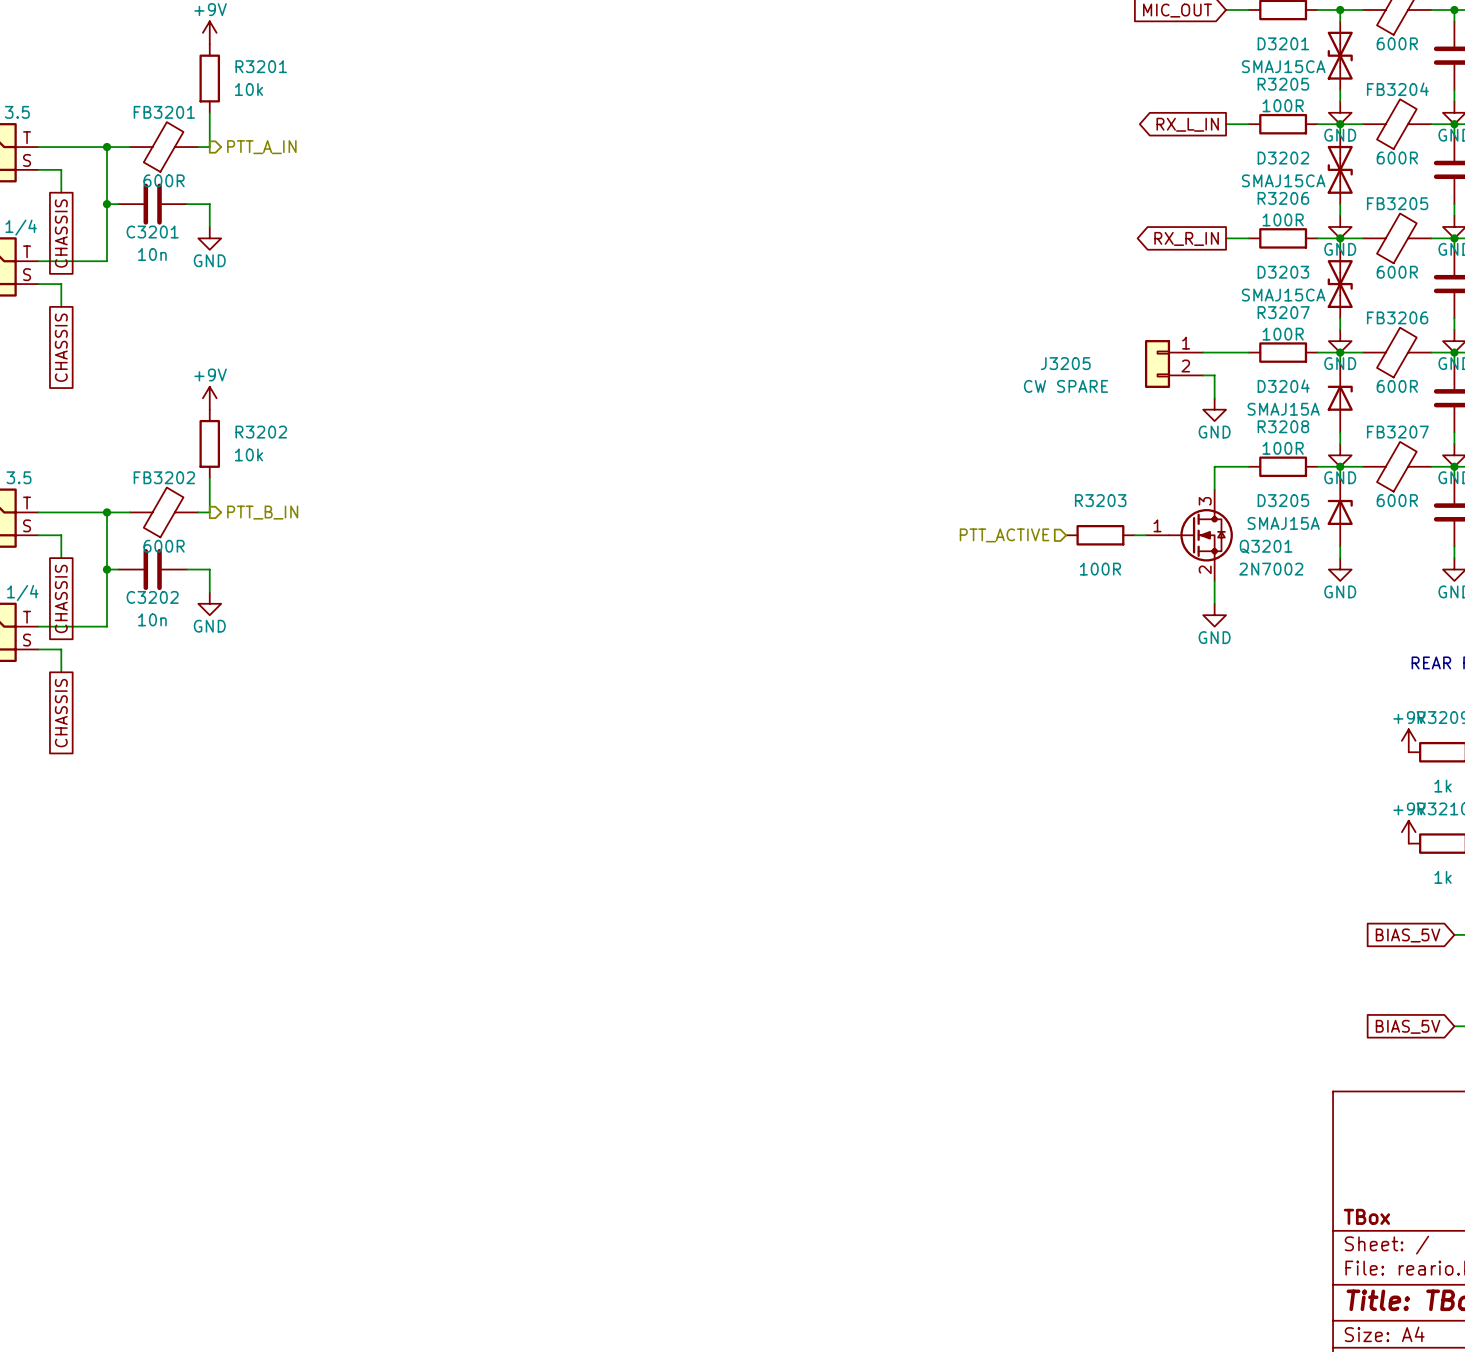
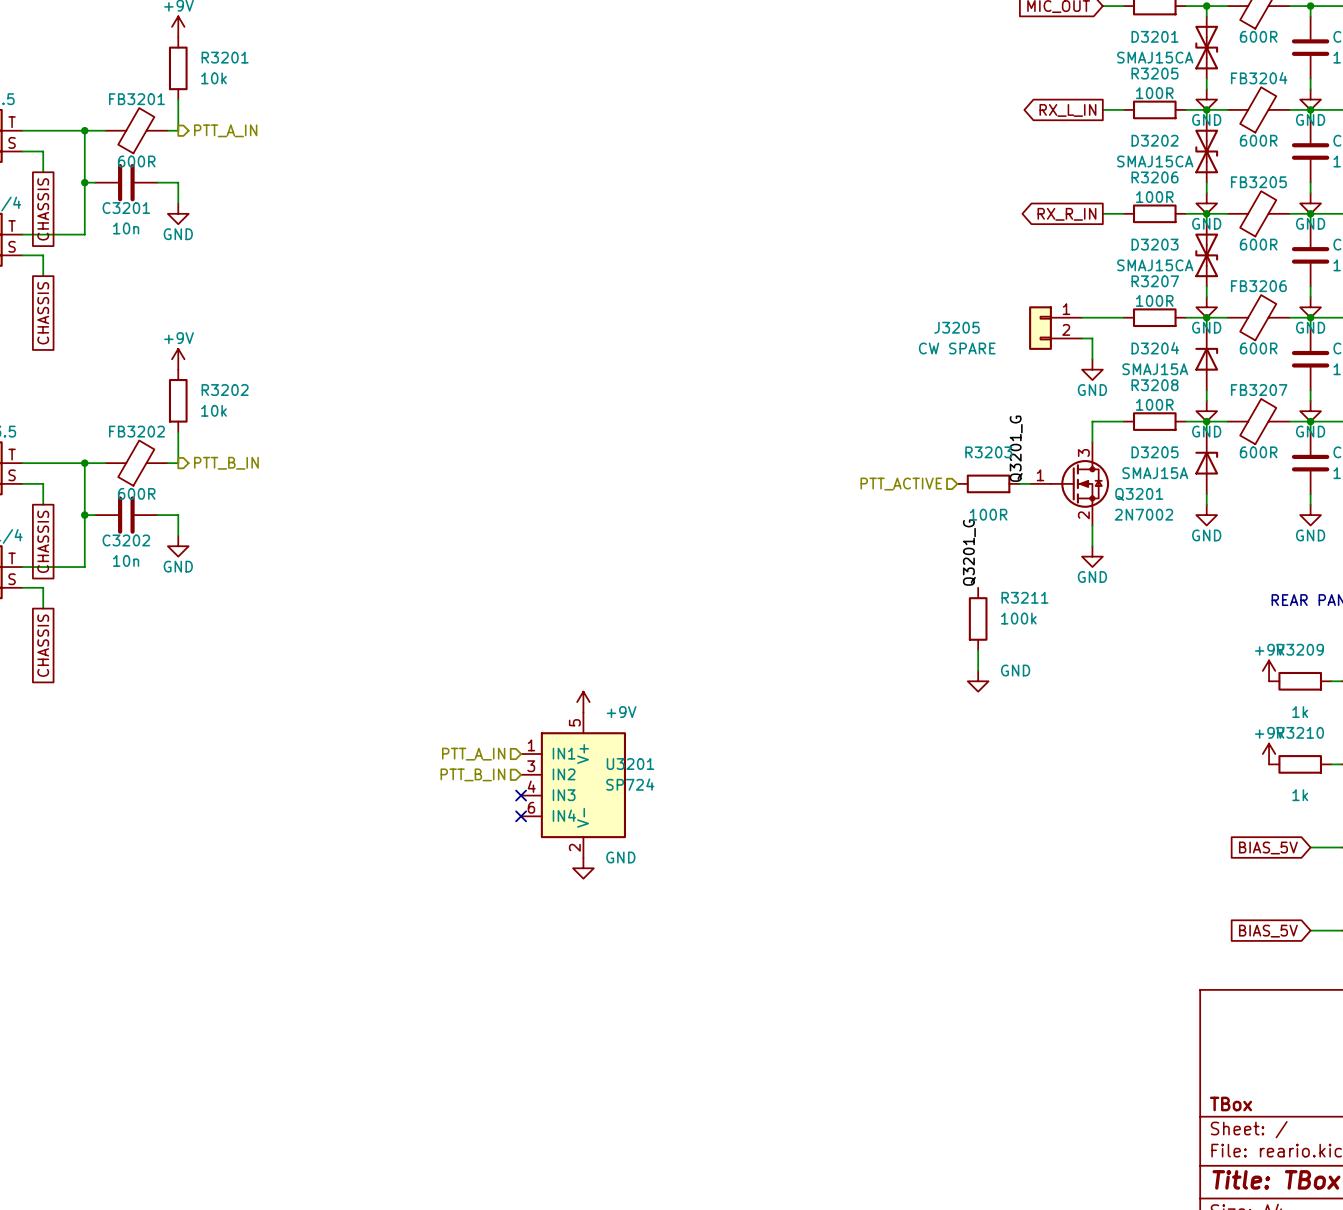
label: none -> Q3201_G (1016, 448)
label: none -> Q3201_G (969, 552)
R3211: none -> 100k (978, 618)
wire: none -> (978, 650) (978, 670)
power symbol: none -> GND (978, 681)
power symbol: none -> +9V (583, 702)
hierarchical label: none -> PTT_A_IN (473, 754)
hierarchical label: none -> PTT_B_IN (472, 774)
U3201: none -> SP724 (573, 785)
no-connect mark: none -> (521, 795)
no-connect mark: none -> (521, 816)
power symbol: none -> GND (583, 868)

